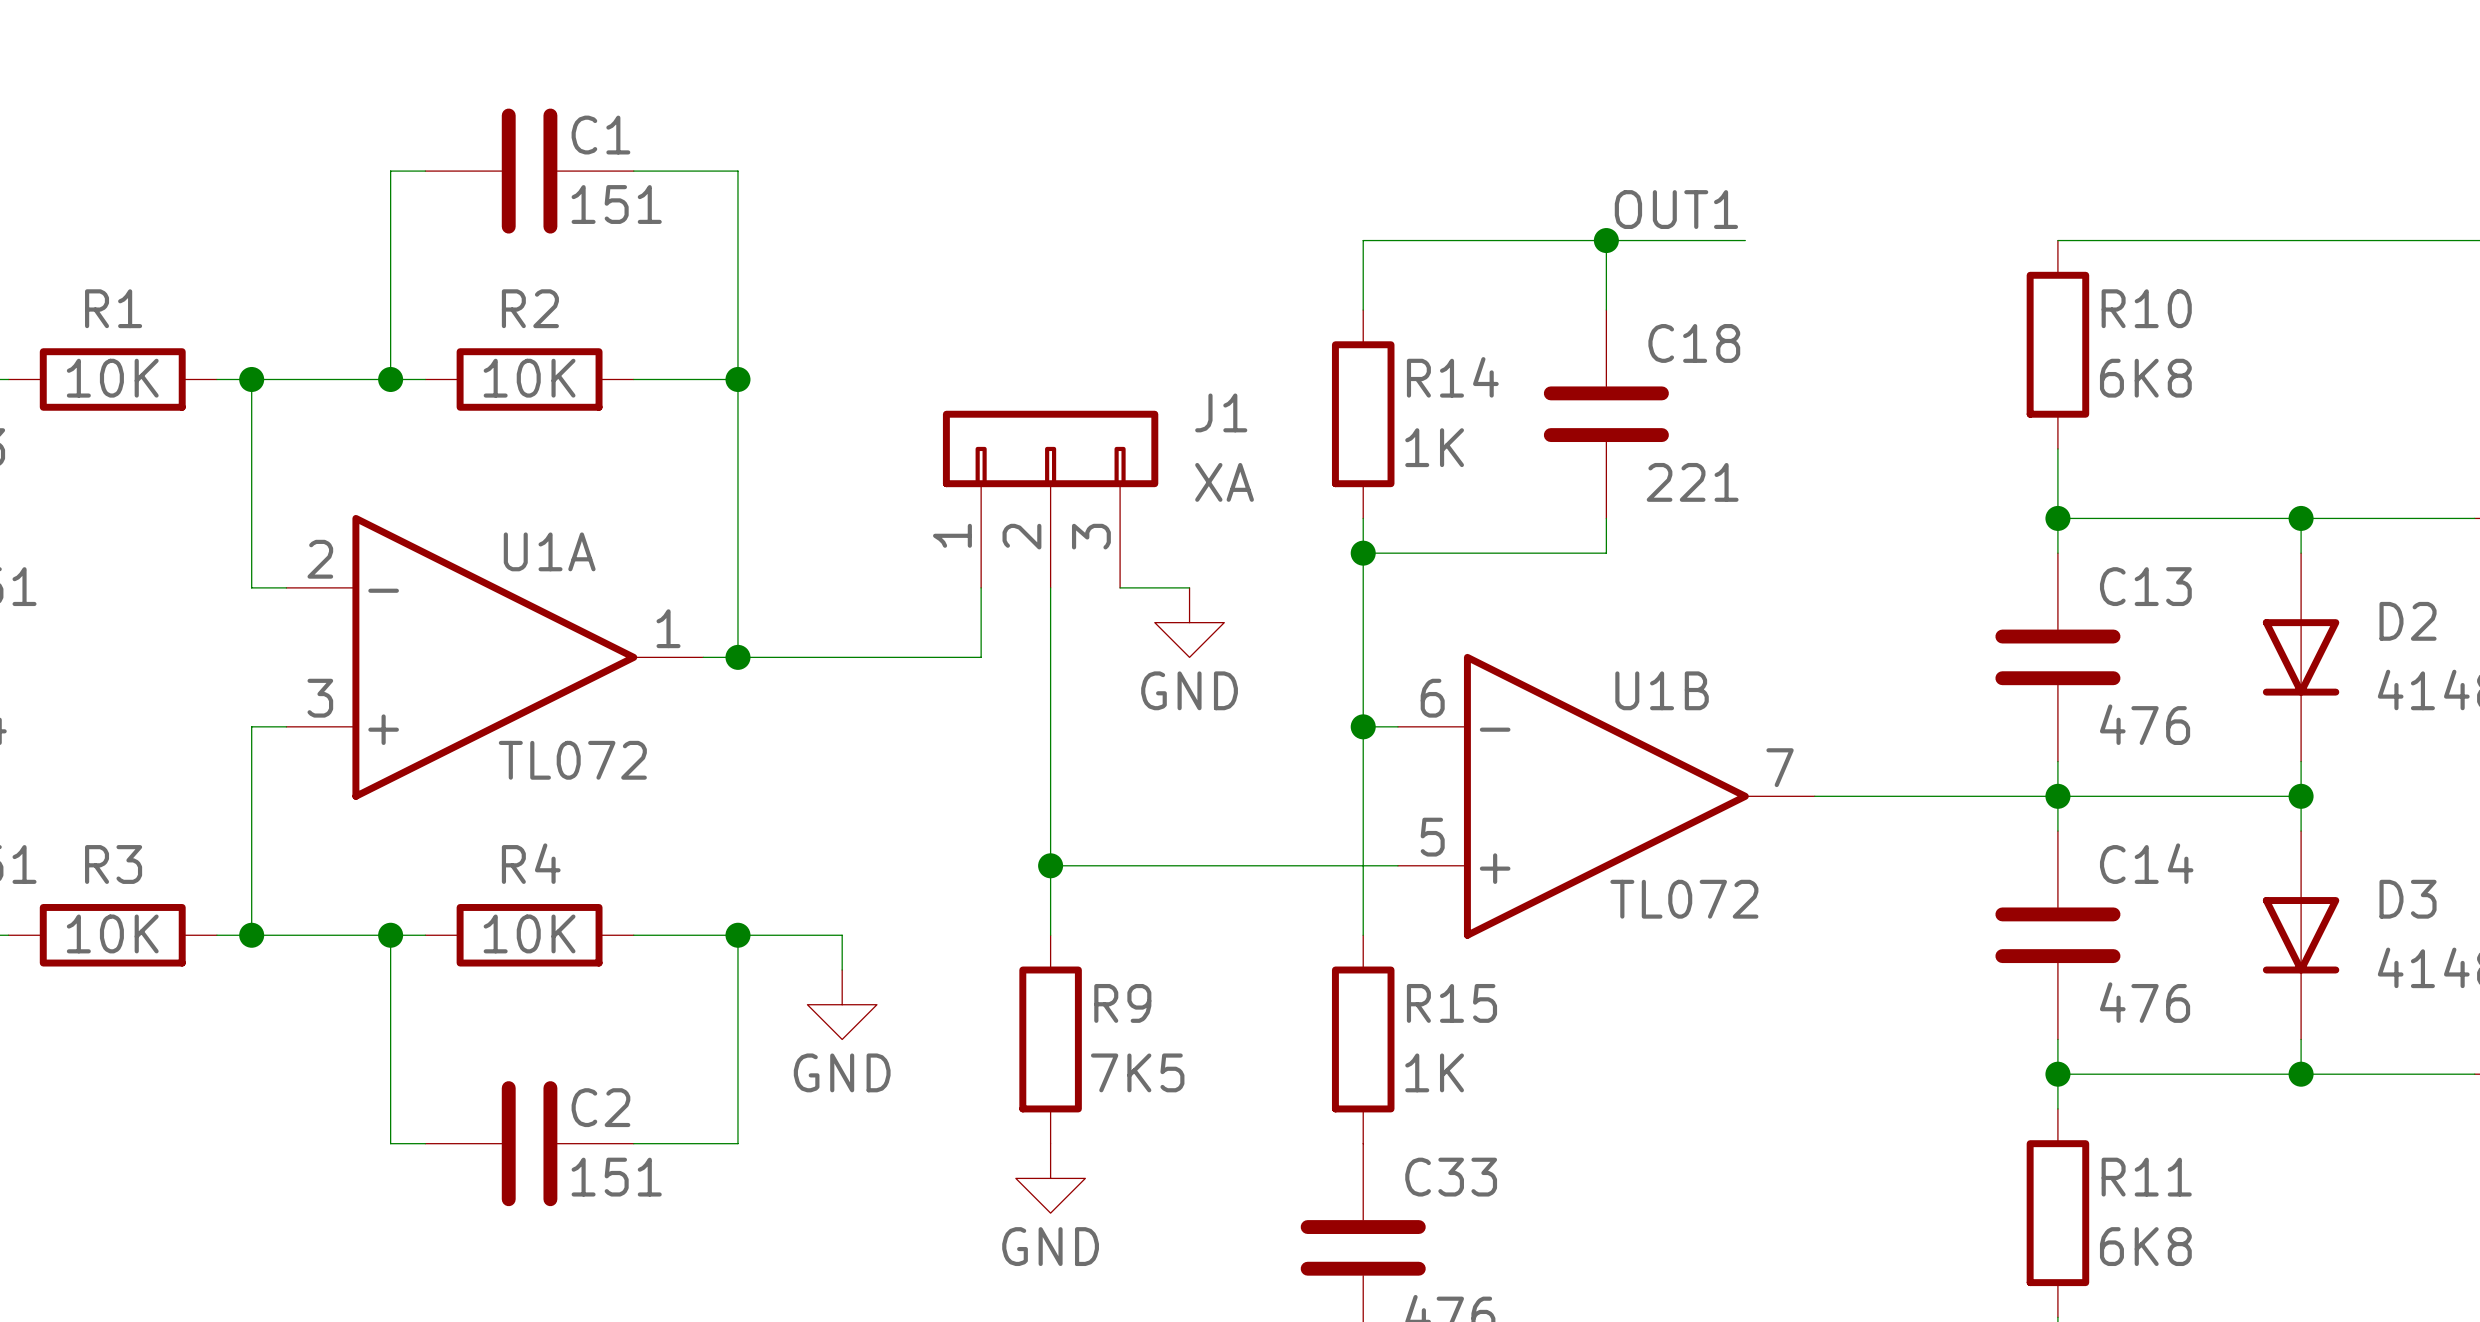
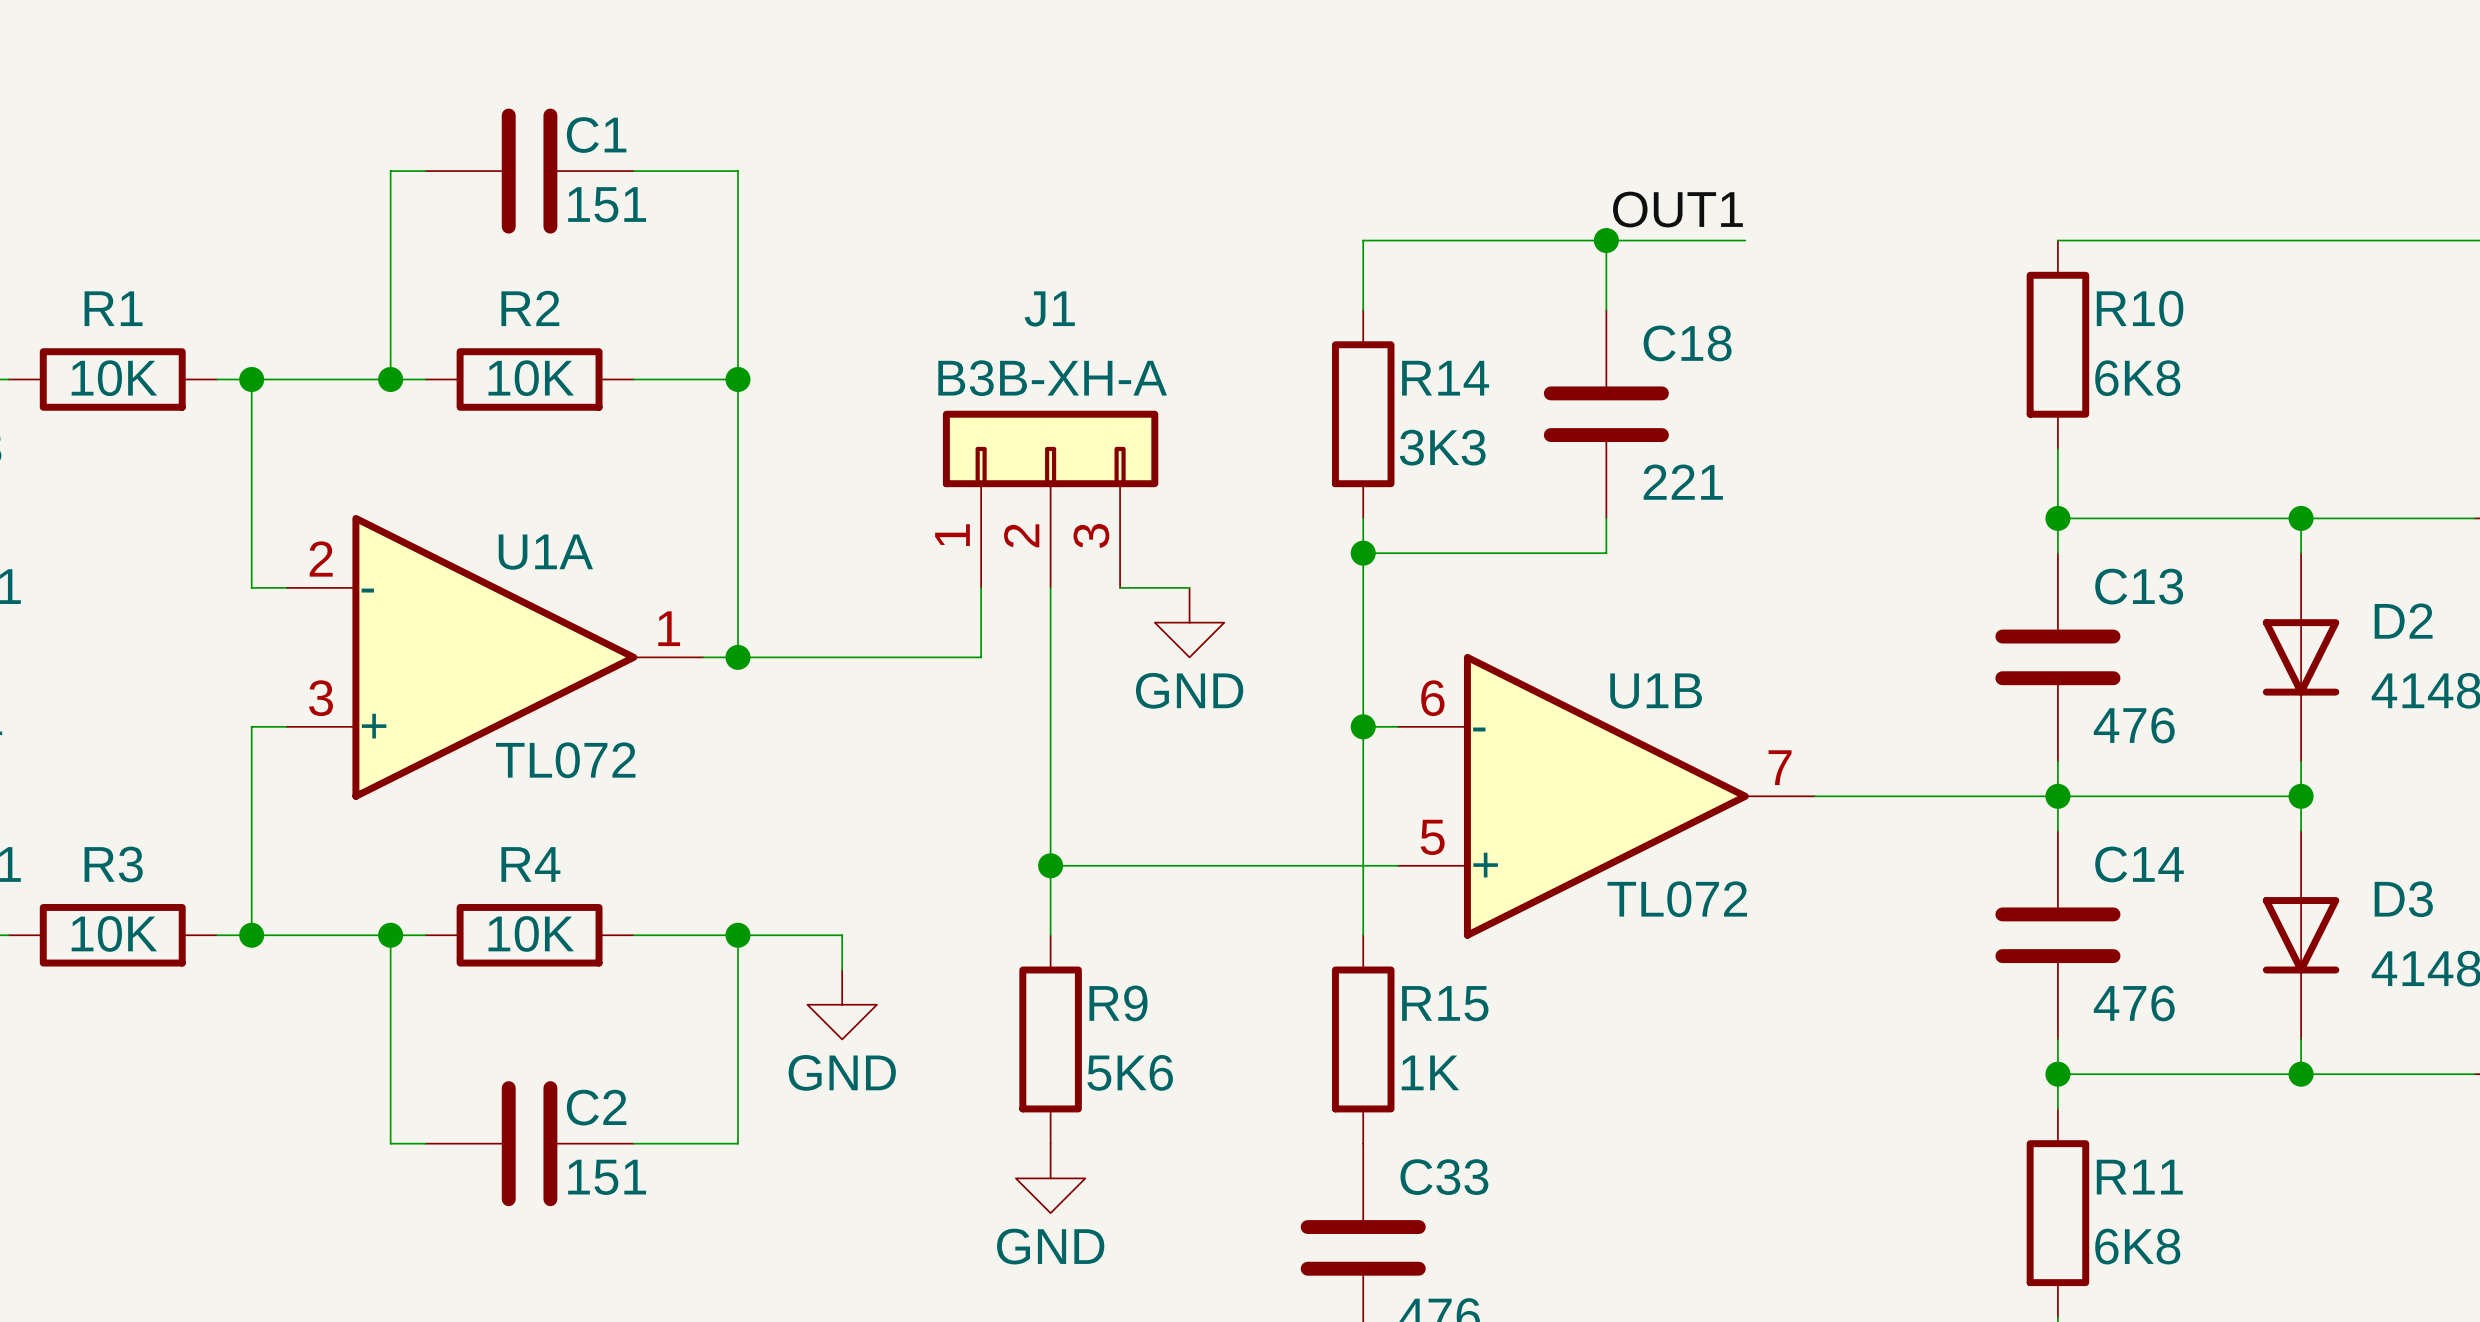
J1 name position: J1 (1221, 412) -> J1 (1049, 308)
R14 value: 1K (1434, 447) -> 3K3 (1442, 447)
J1 value: XA (1224, 482) -> B3B-XH-A (1052, 378)
R9 value: 7K5 (1137, 1072) -> 5K6 (1130, 1072)

